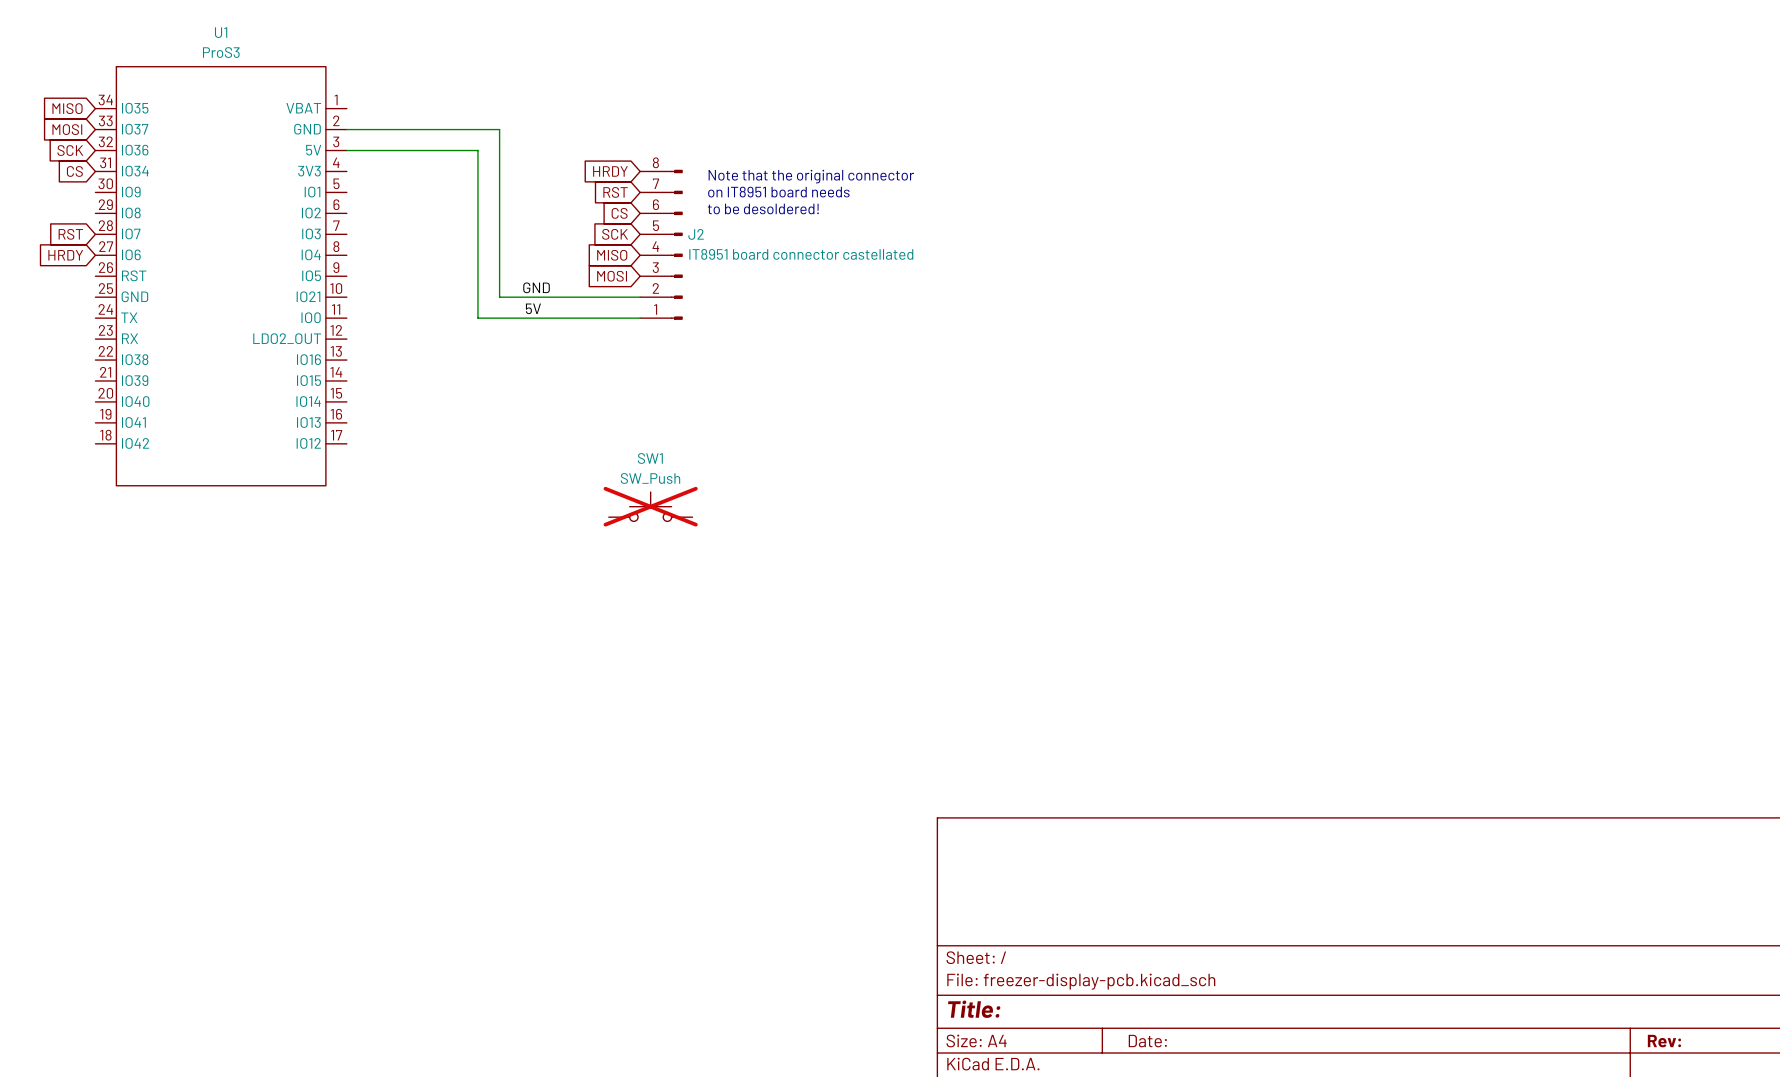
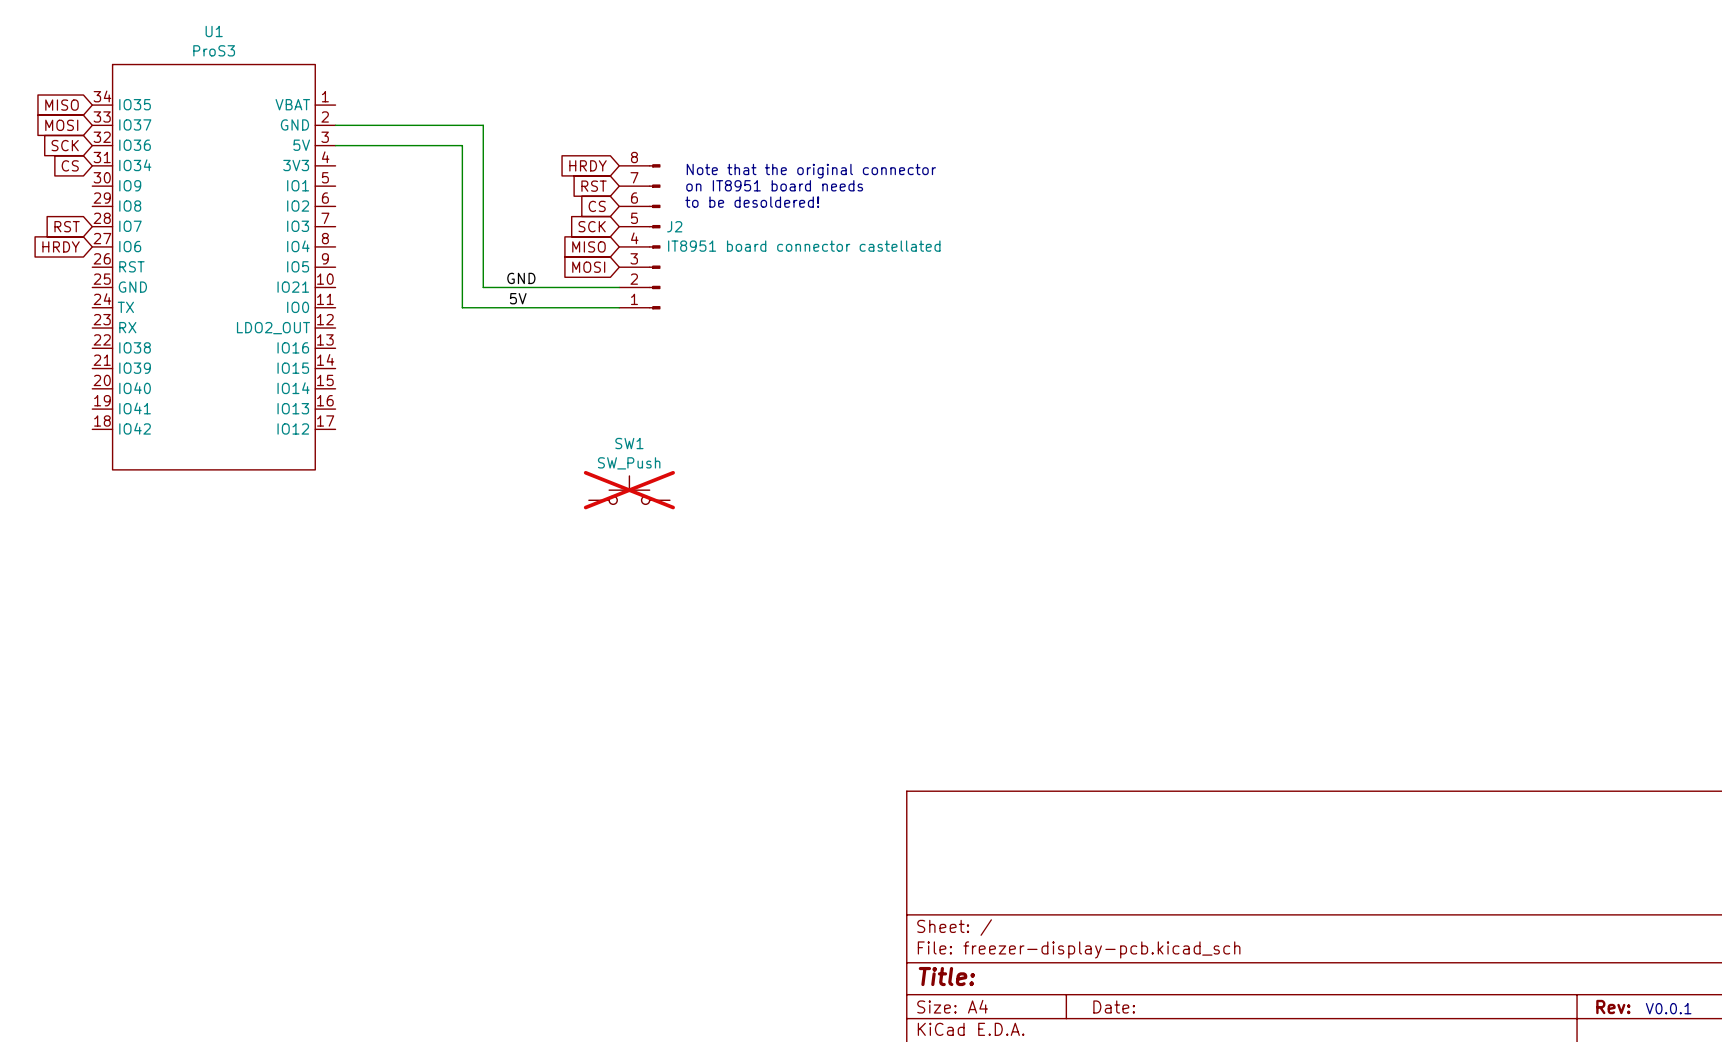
text: none -> V0.0.1 (1668, 1008)

